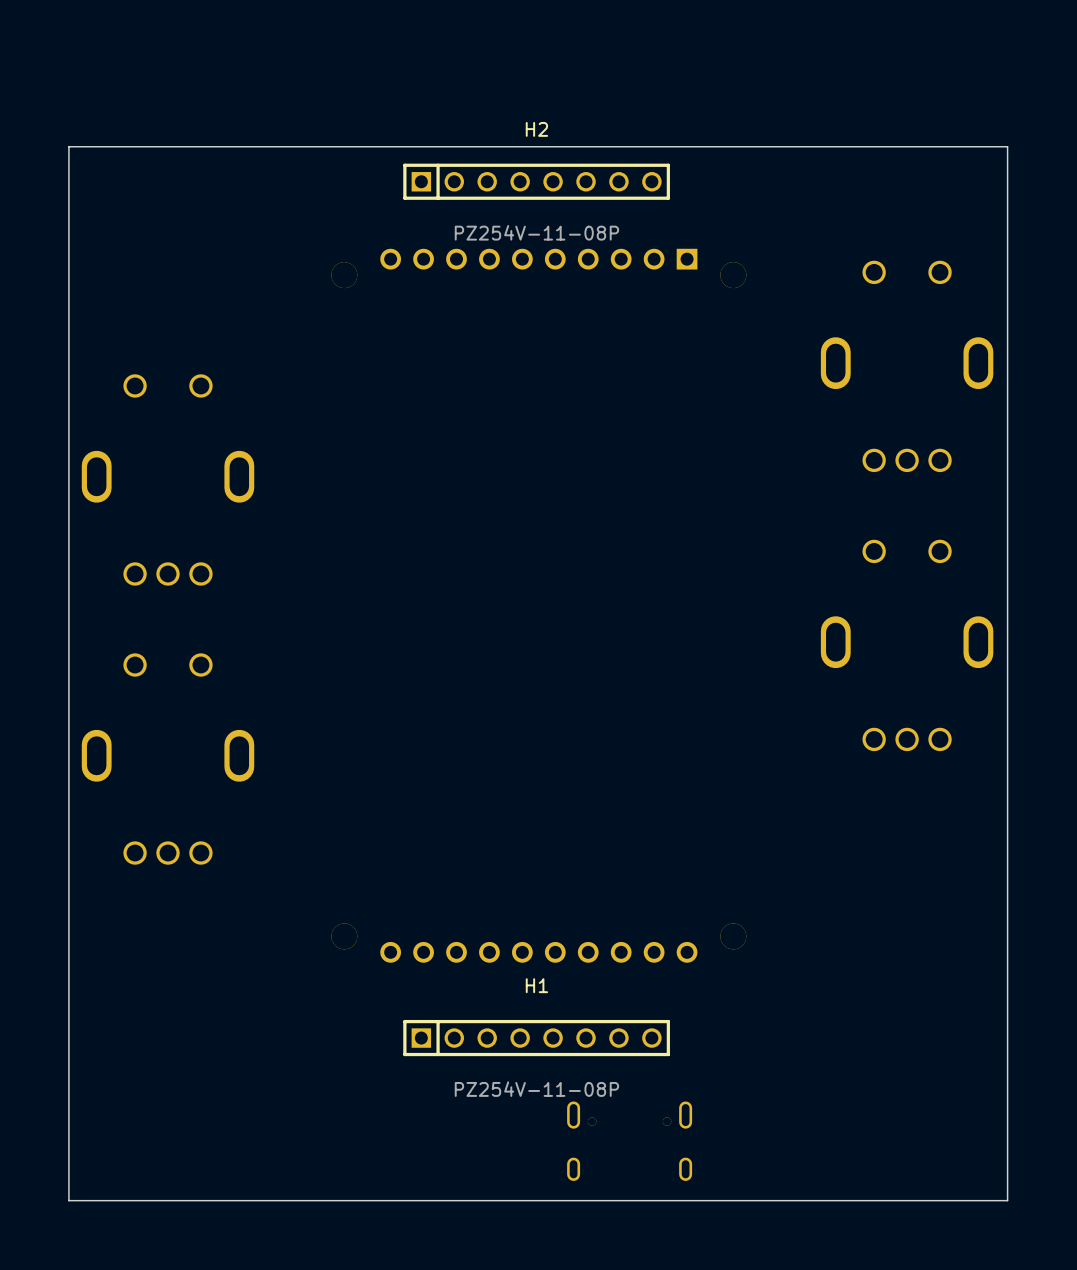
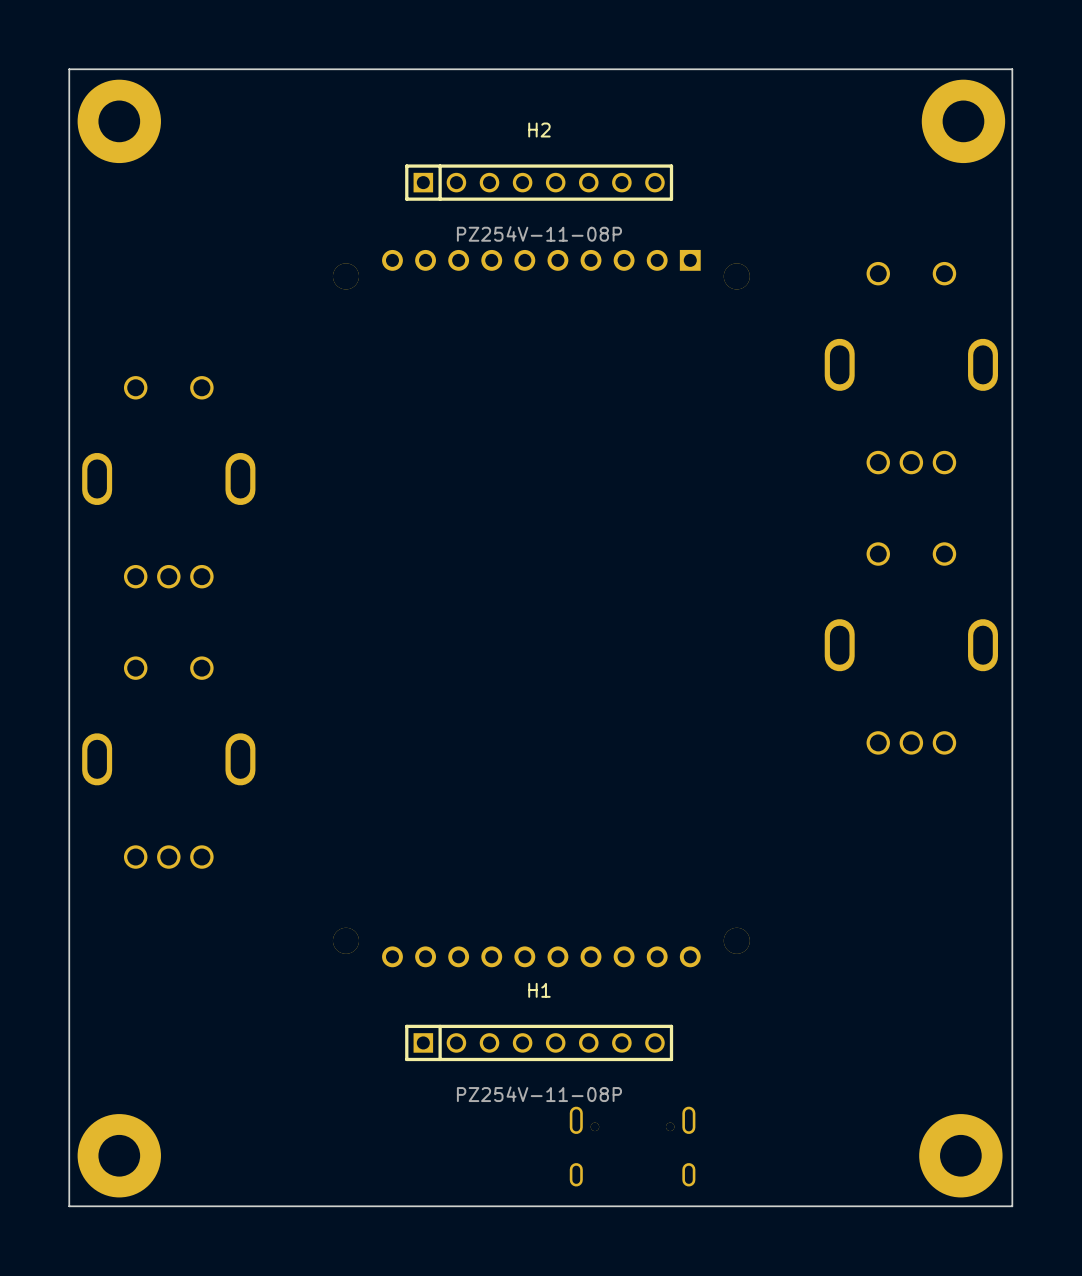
part: none -> (119, 121)
part: none -> (963, 121)
board edge: (1007, 146) (68, 146) -> (1012, 147) (1012, 69) (69, 69) (69, 147)
part: none -> (119, 1155)
part: none -> (960, 1155)

